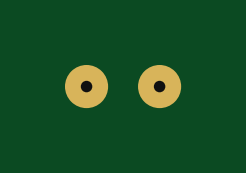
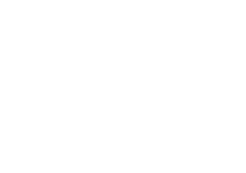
part: (123, 86) -> none

